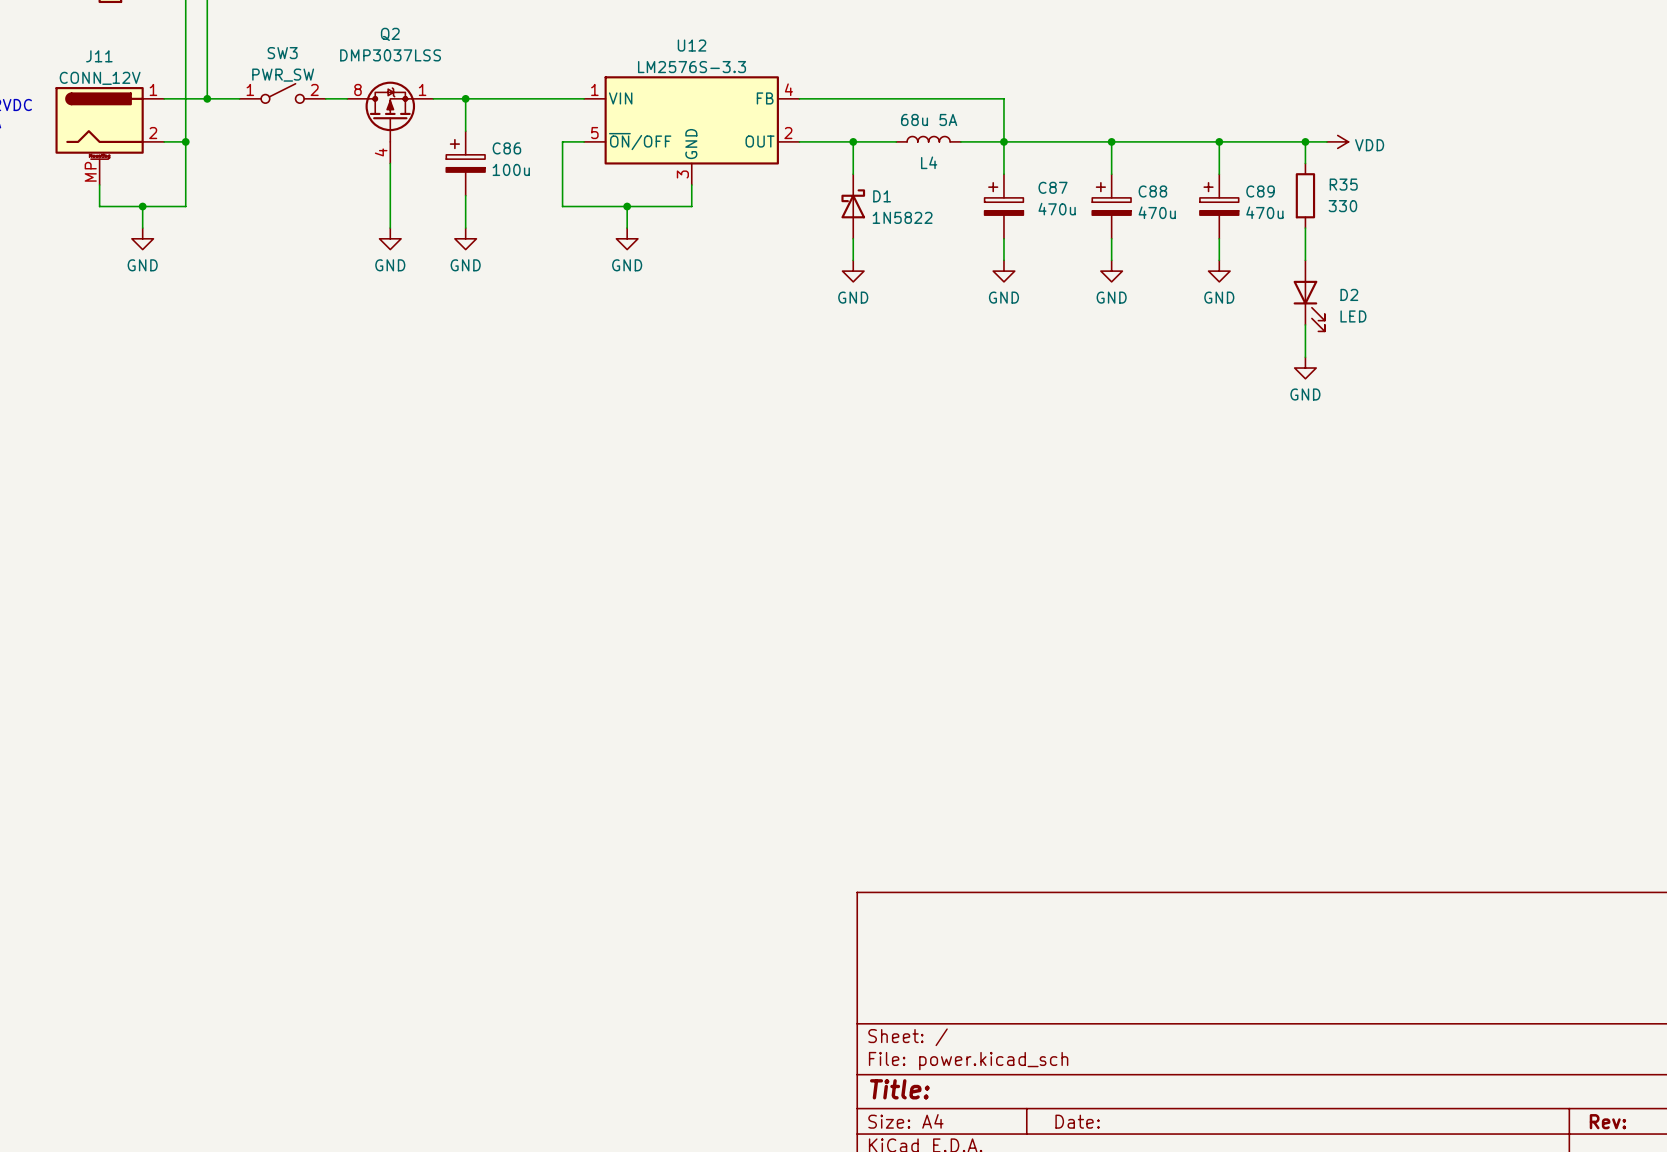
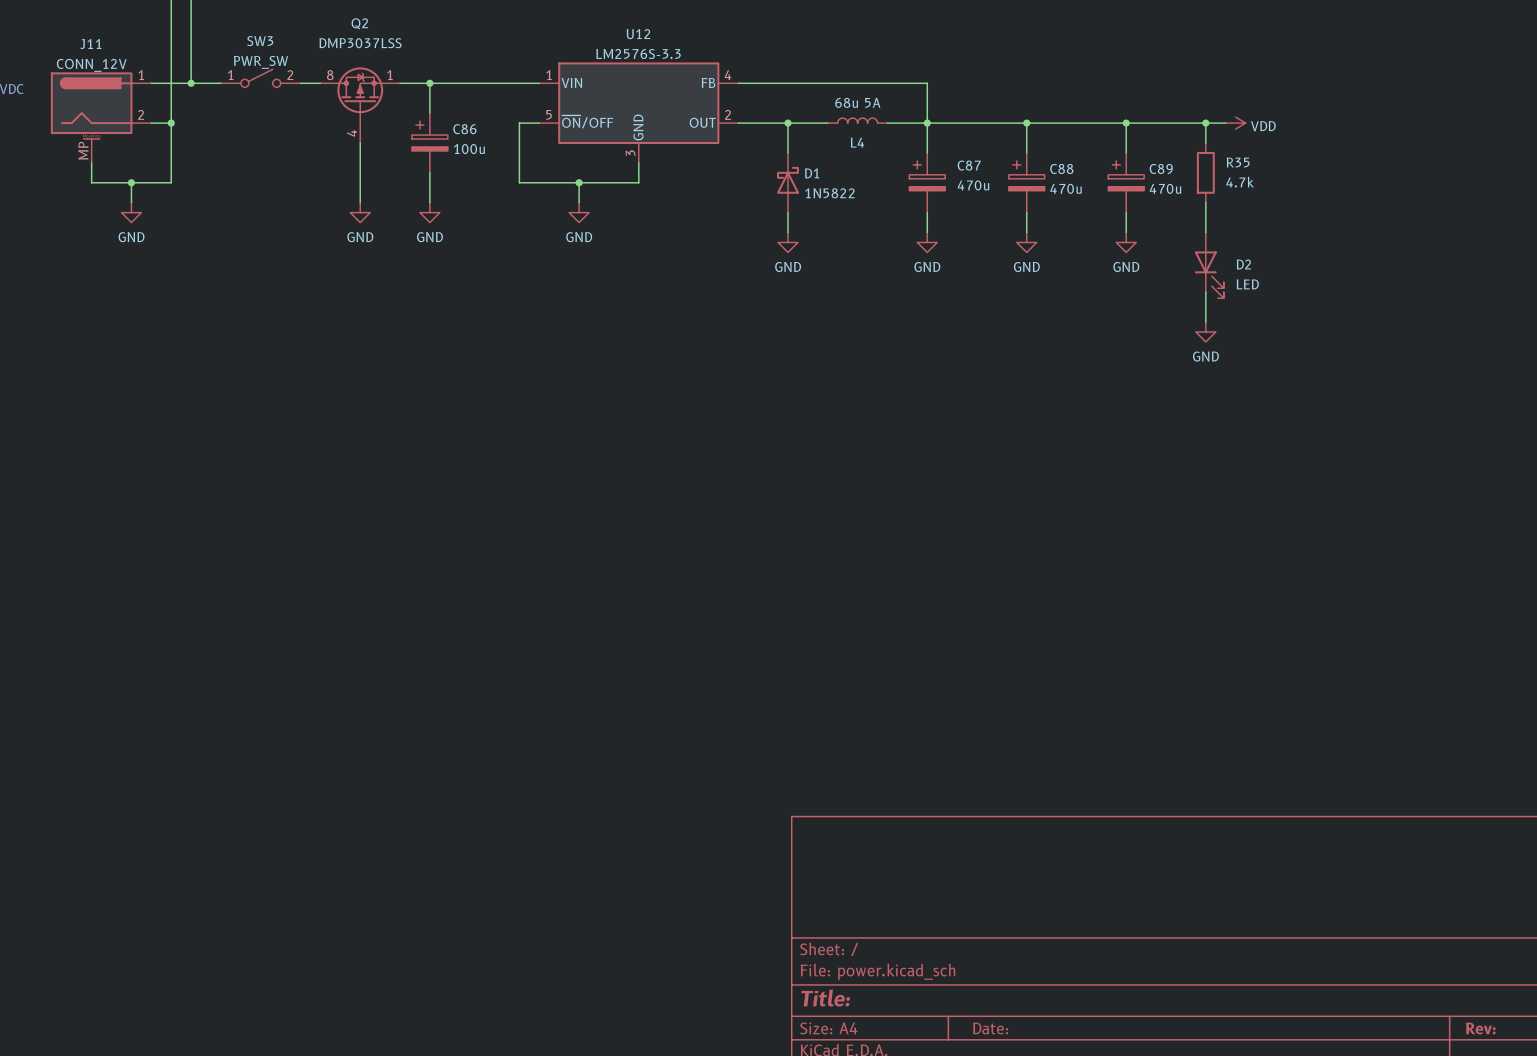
R35 value: 330 (1342, 206) -> 4.7k (1240, 182)

